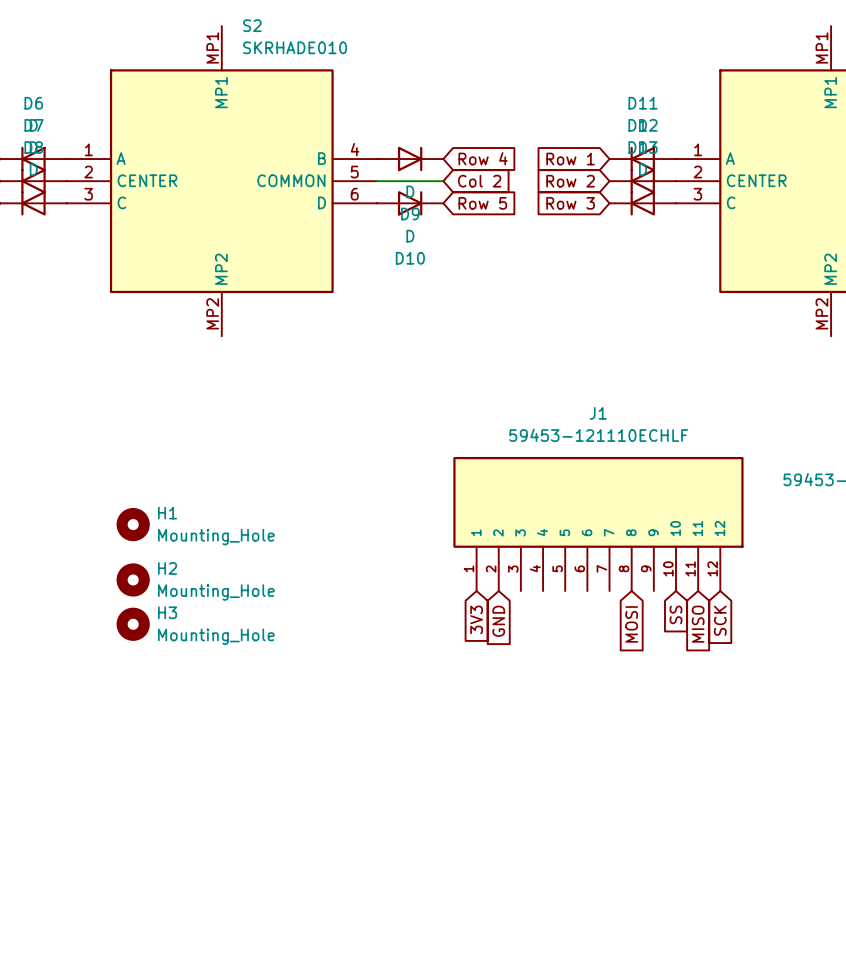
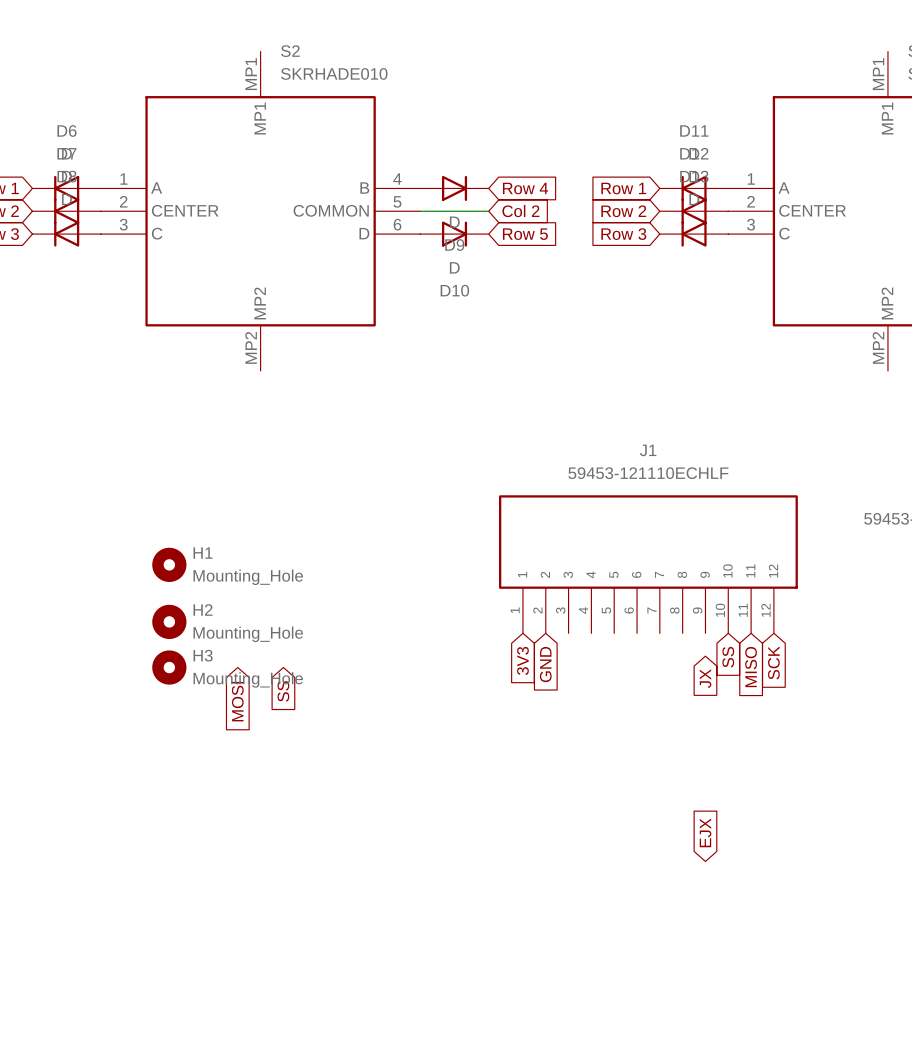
global label: MOSI (631, 624) -> none
global label: none -> JX (705, 678)
global label: none -> SS (283, 691)
global label: none -> MOSI (237, 701)
global label: none -> EJX (705, 832)

